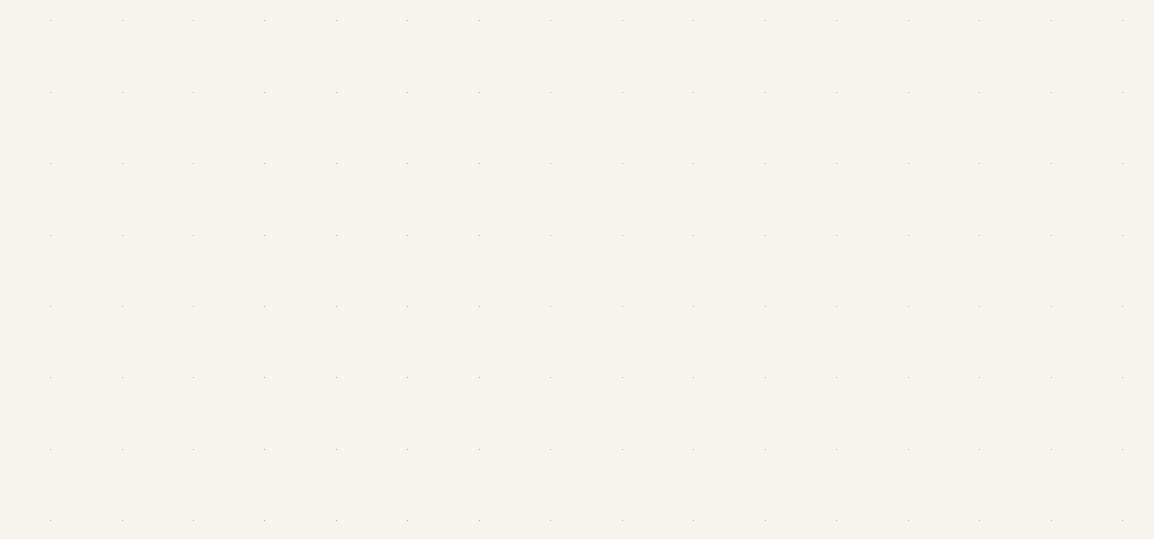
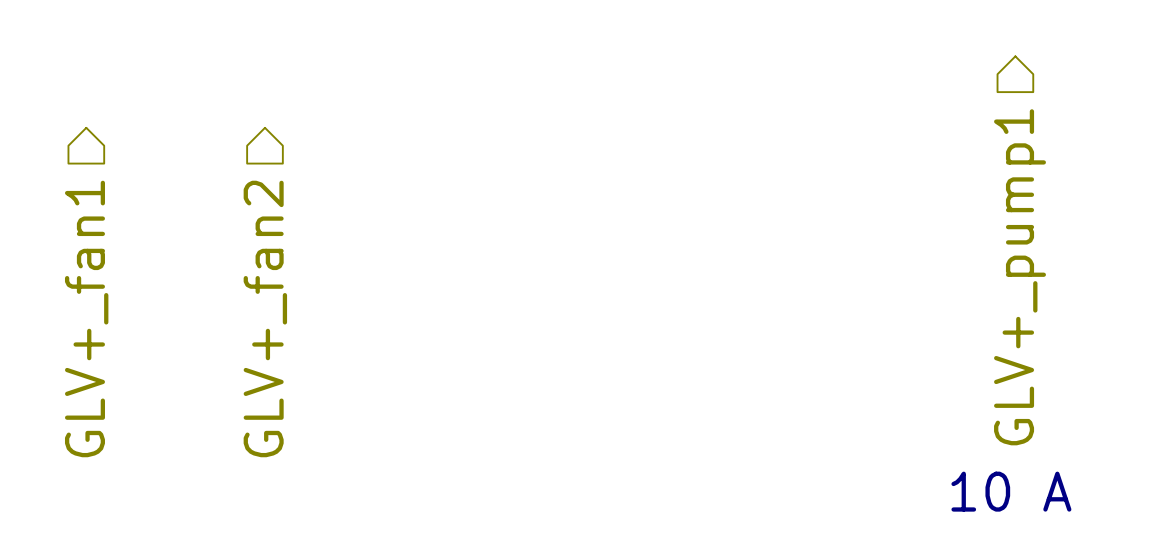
hierarchical label: none -> GLV+_pump1 (1020, 277)
hierarchical label: none -> GLV+_fan1 (86, 318)
hierarchical label: none -> GLV+_fan2 (265, 318)
text: none -> 10 A (1011, 491)

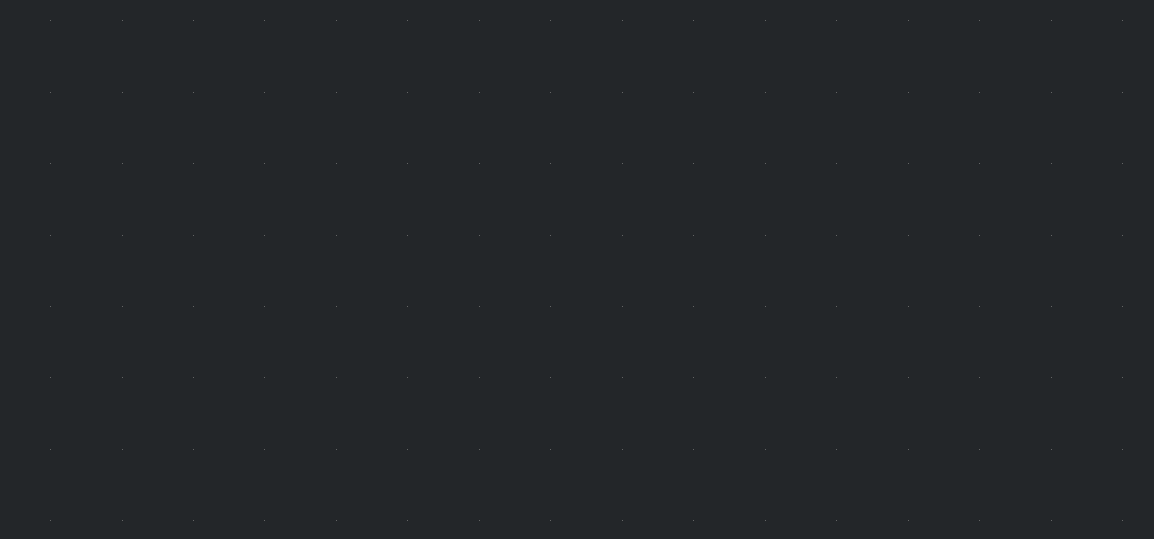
hierarchical label: GLV+_pump1 (1020, 277) -> none
hierarchical label: GLV+_fan1 (86, 318) -> none
hierarchical label: GLV+_fan2 (265, 318) -> none
text: 10 A (1011, 491) -> none

